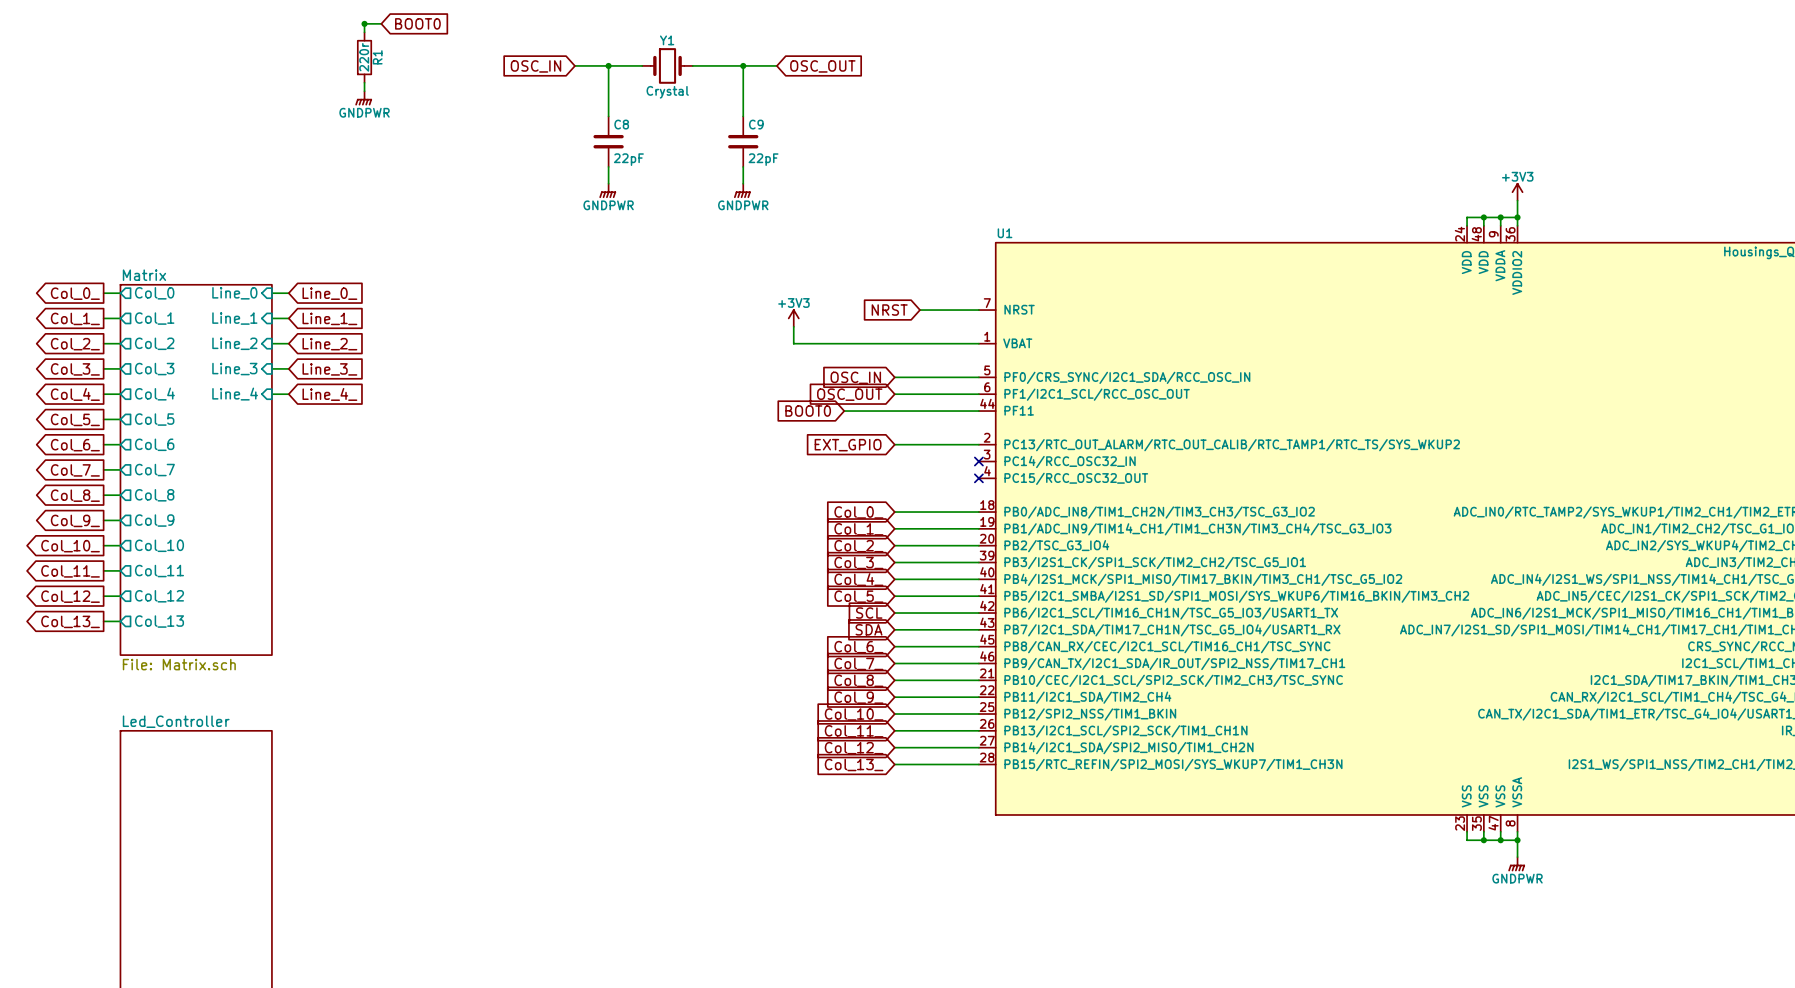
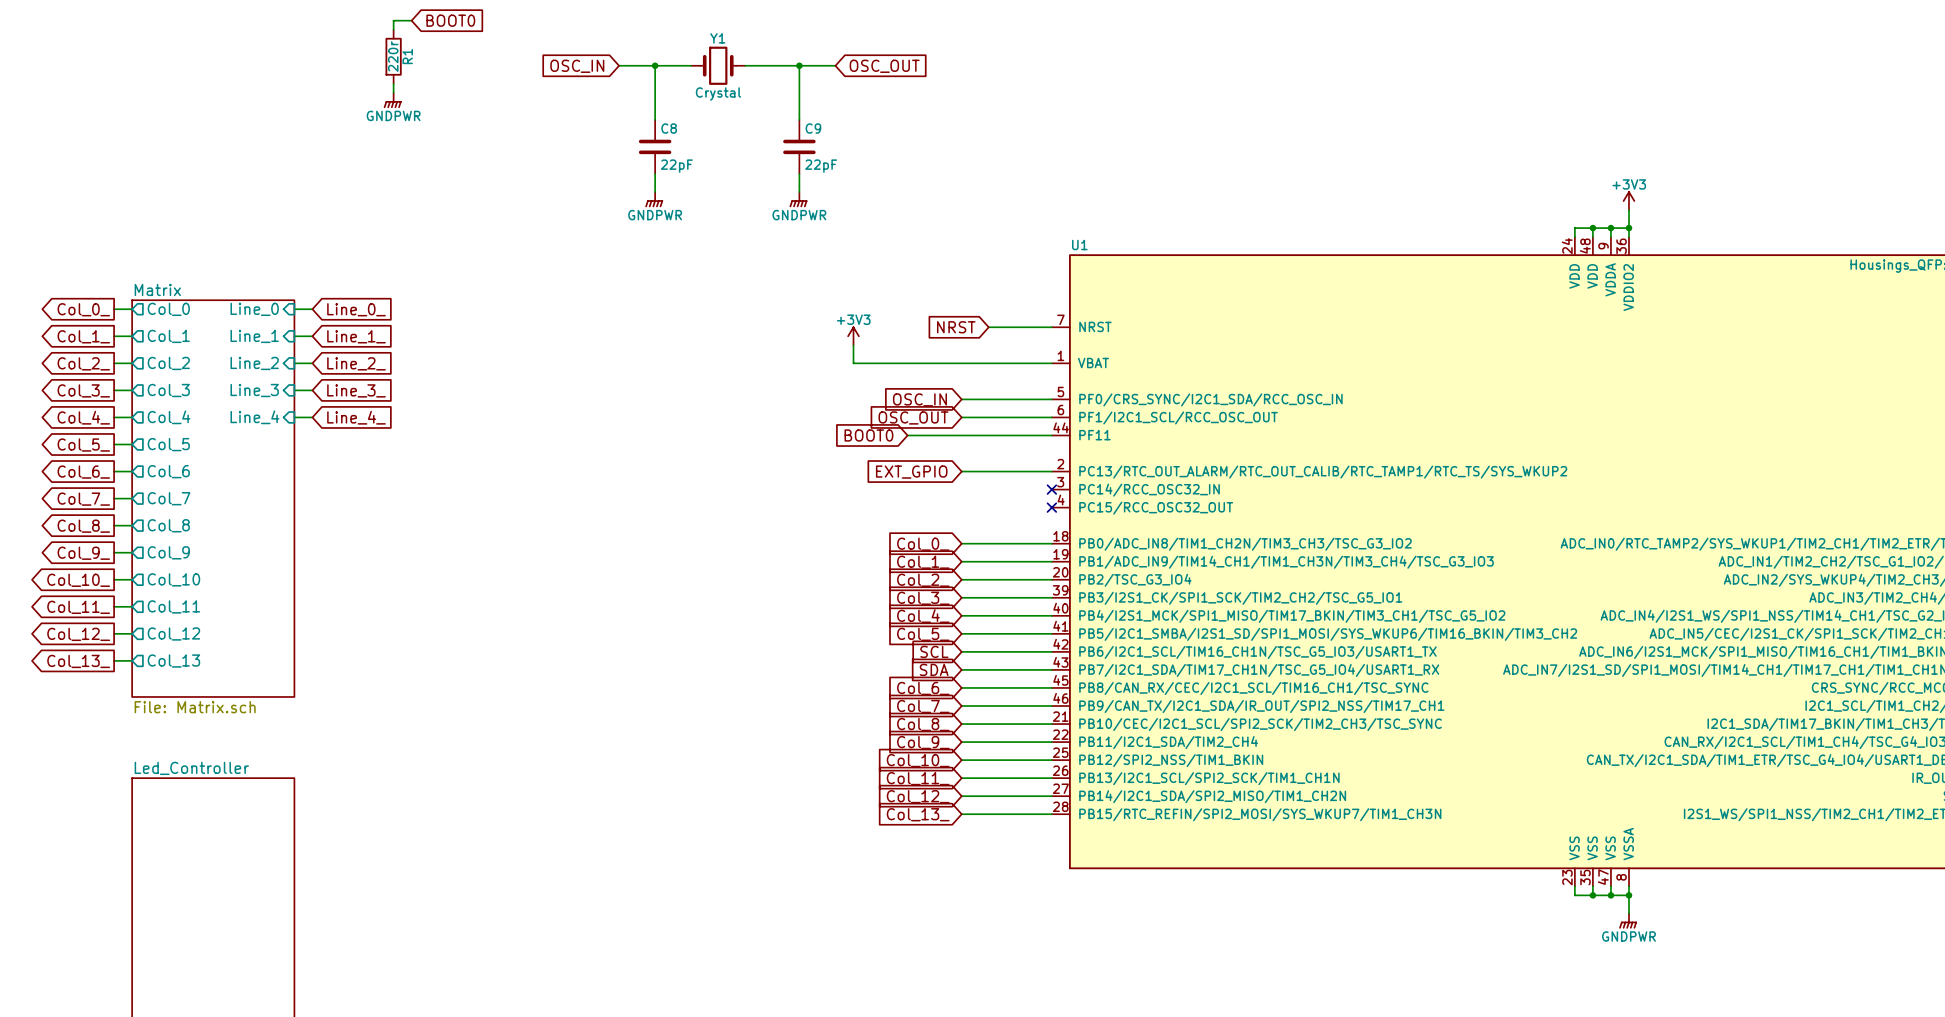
junction: (364, 23) -> none

